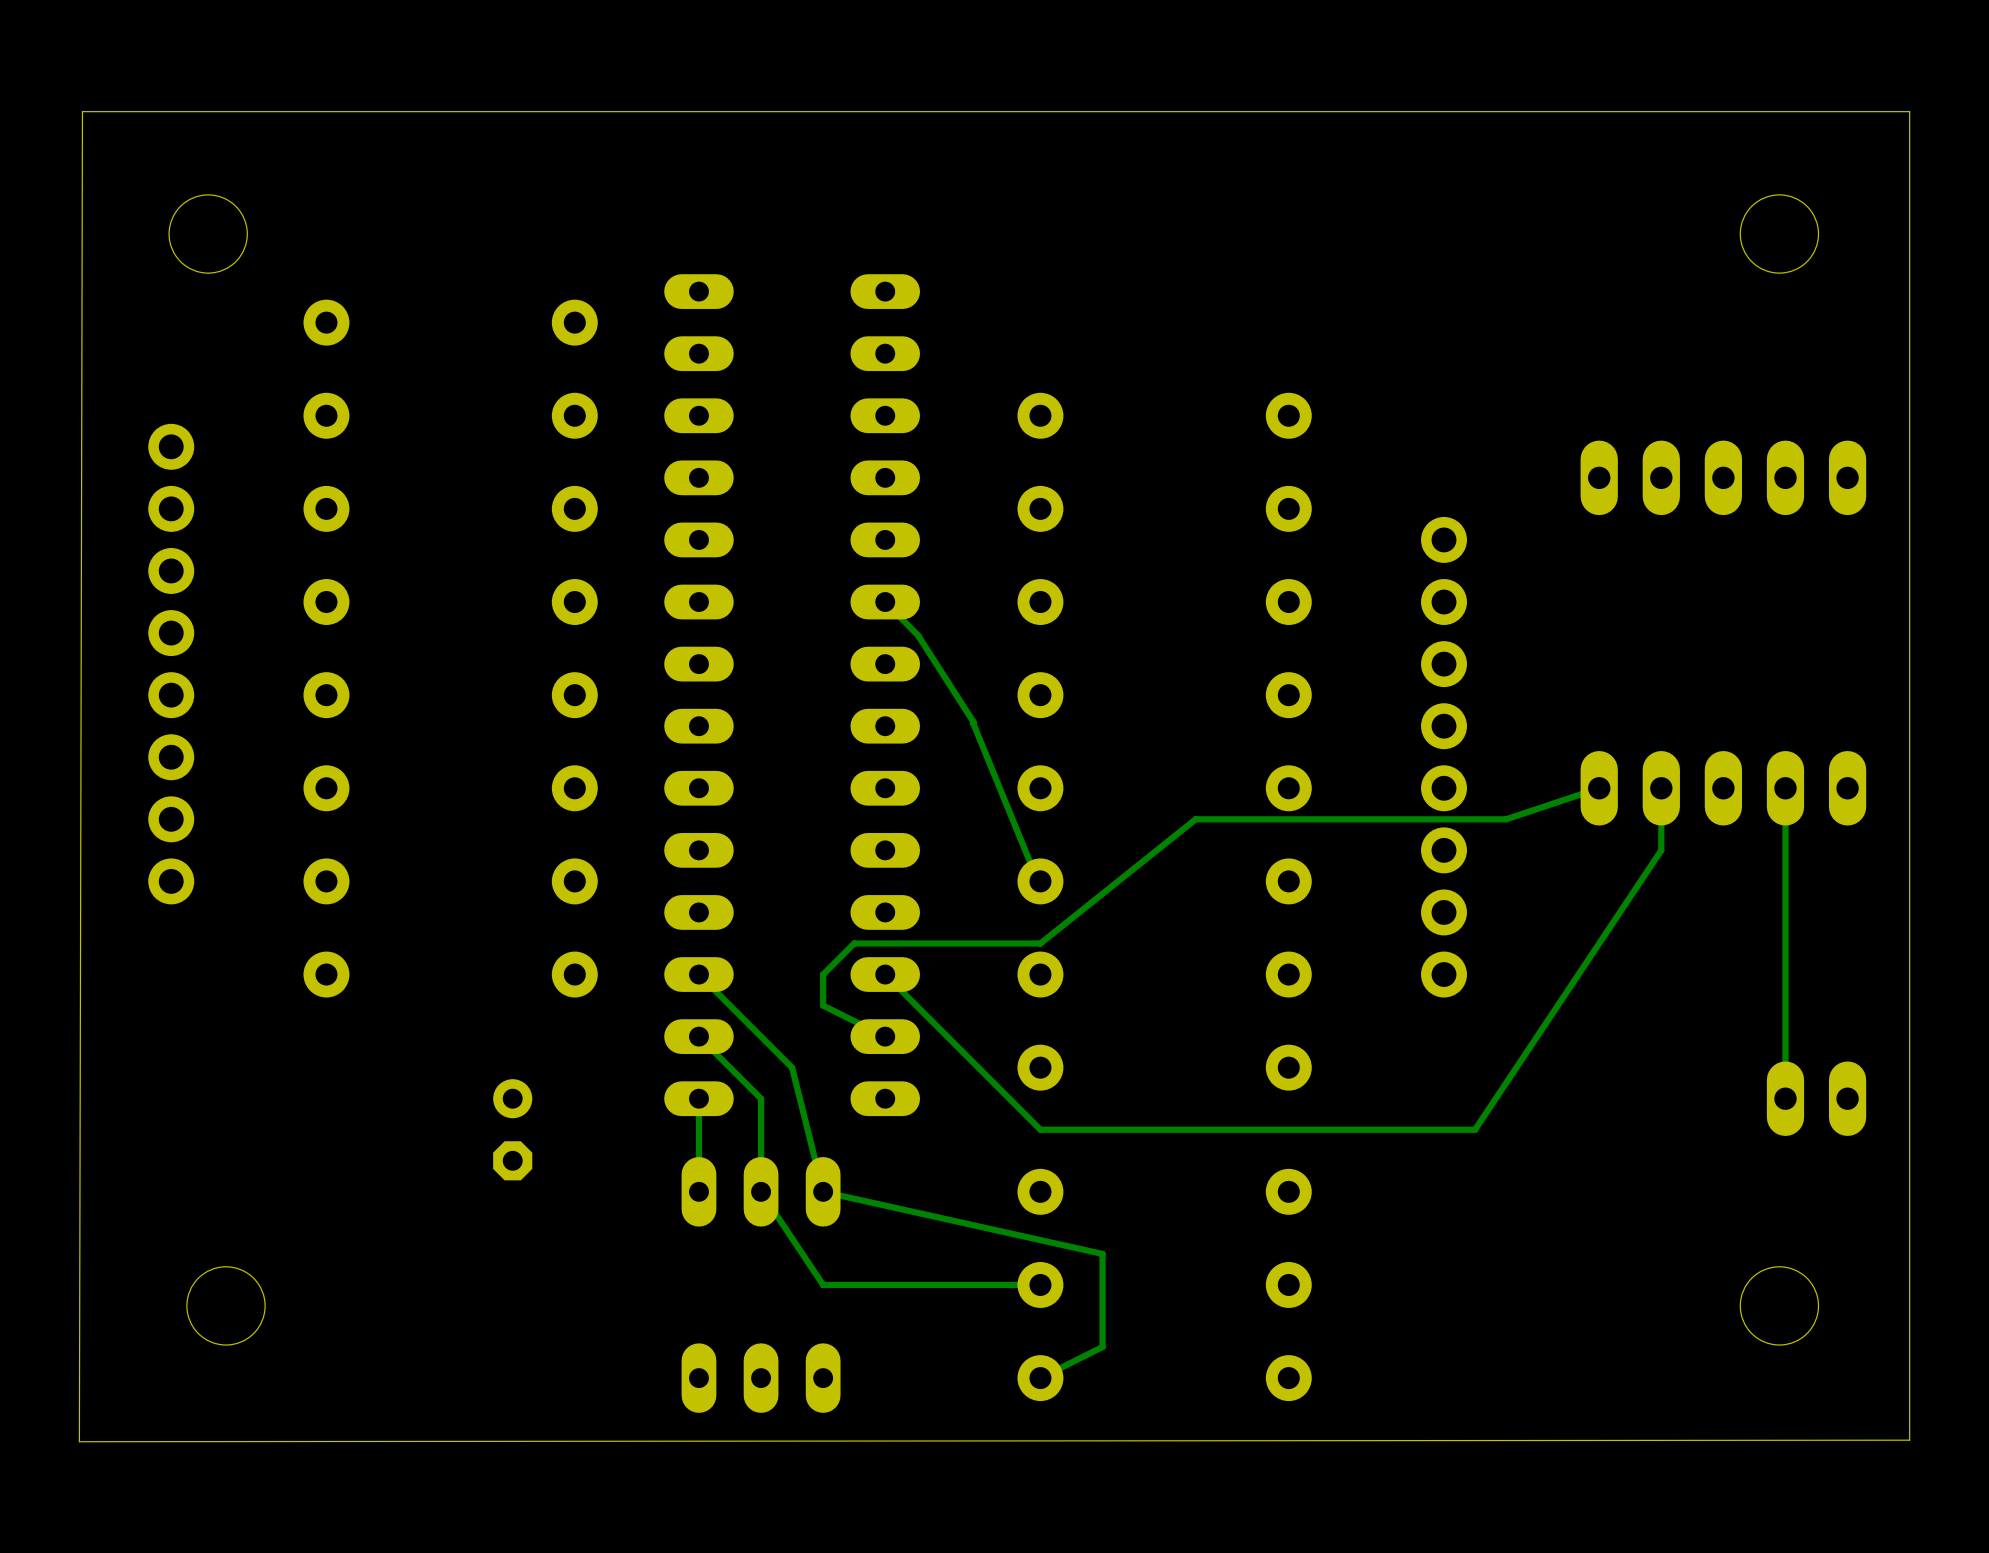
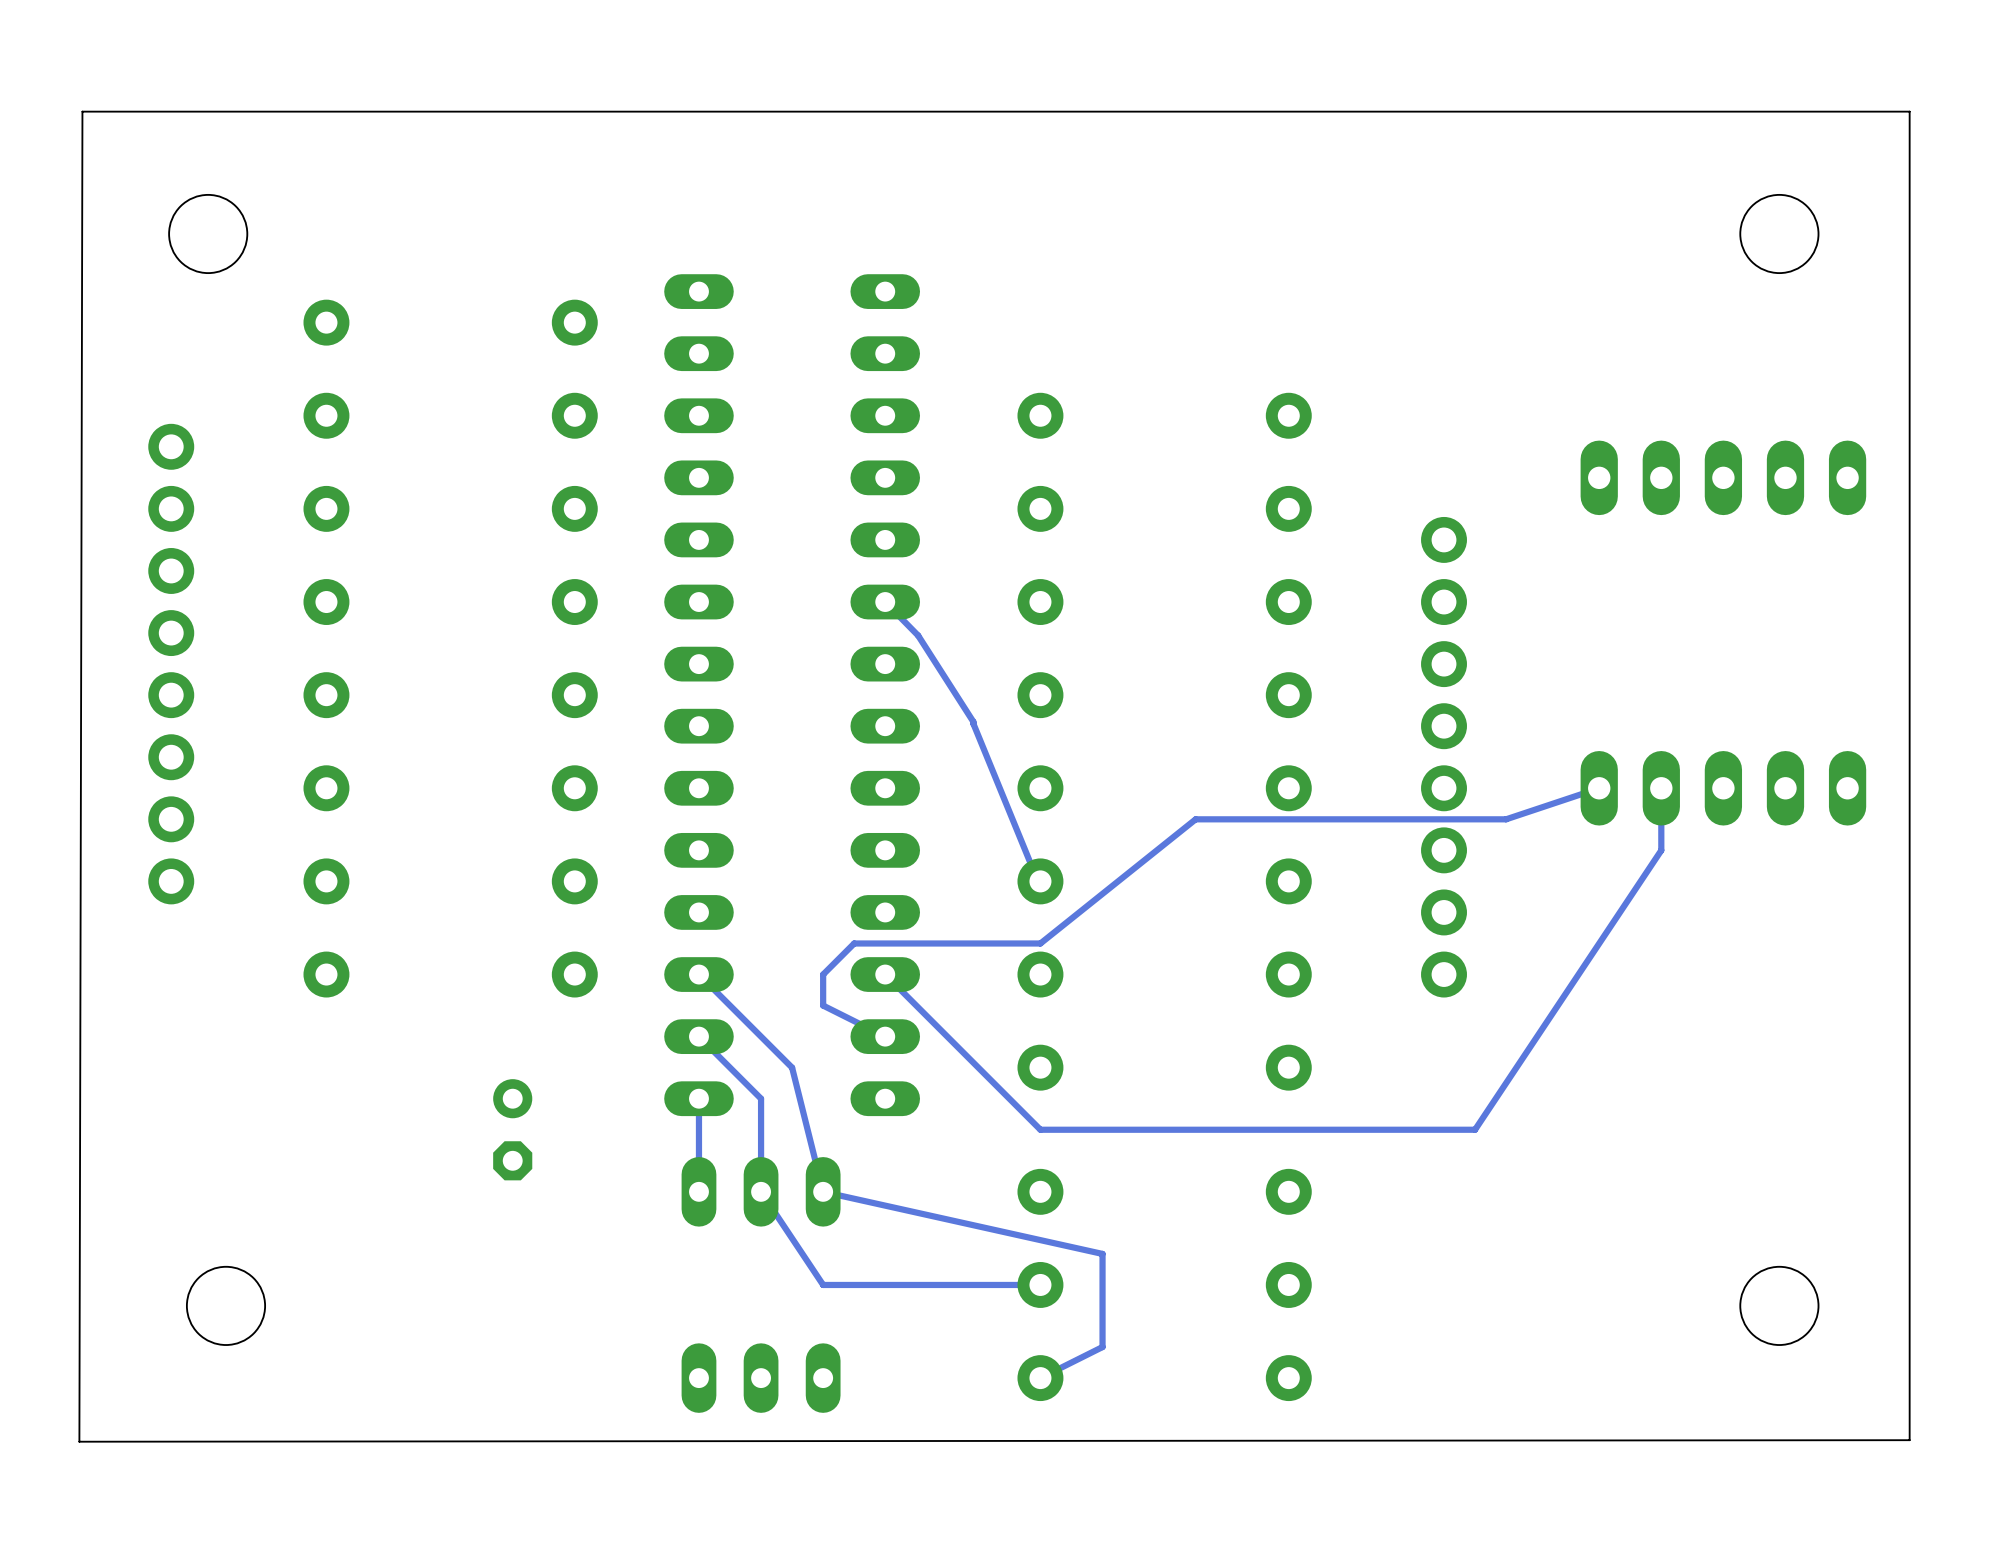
track: (1785, 788) (1785, 1098) -> none
part: (1816, 1098) -> none

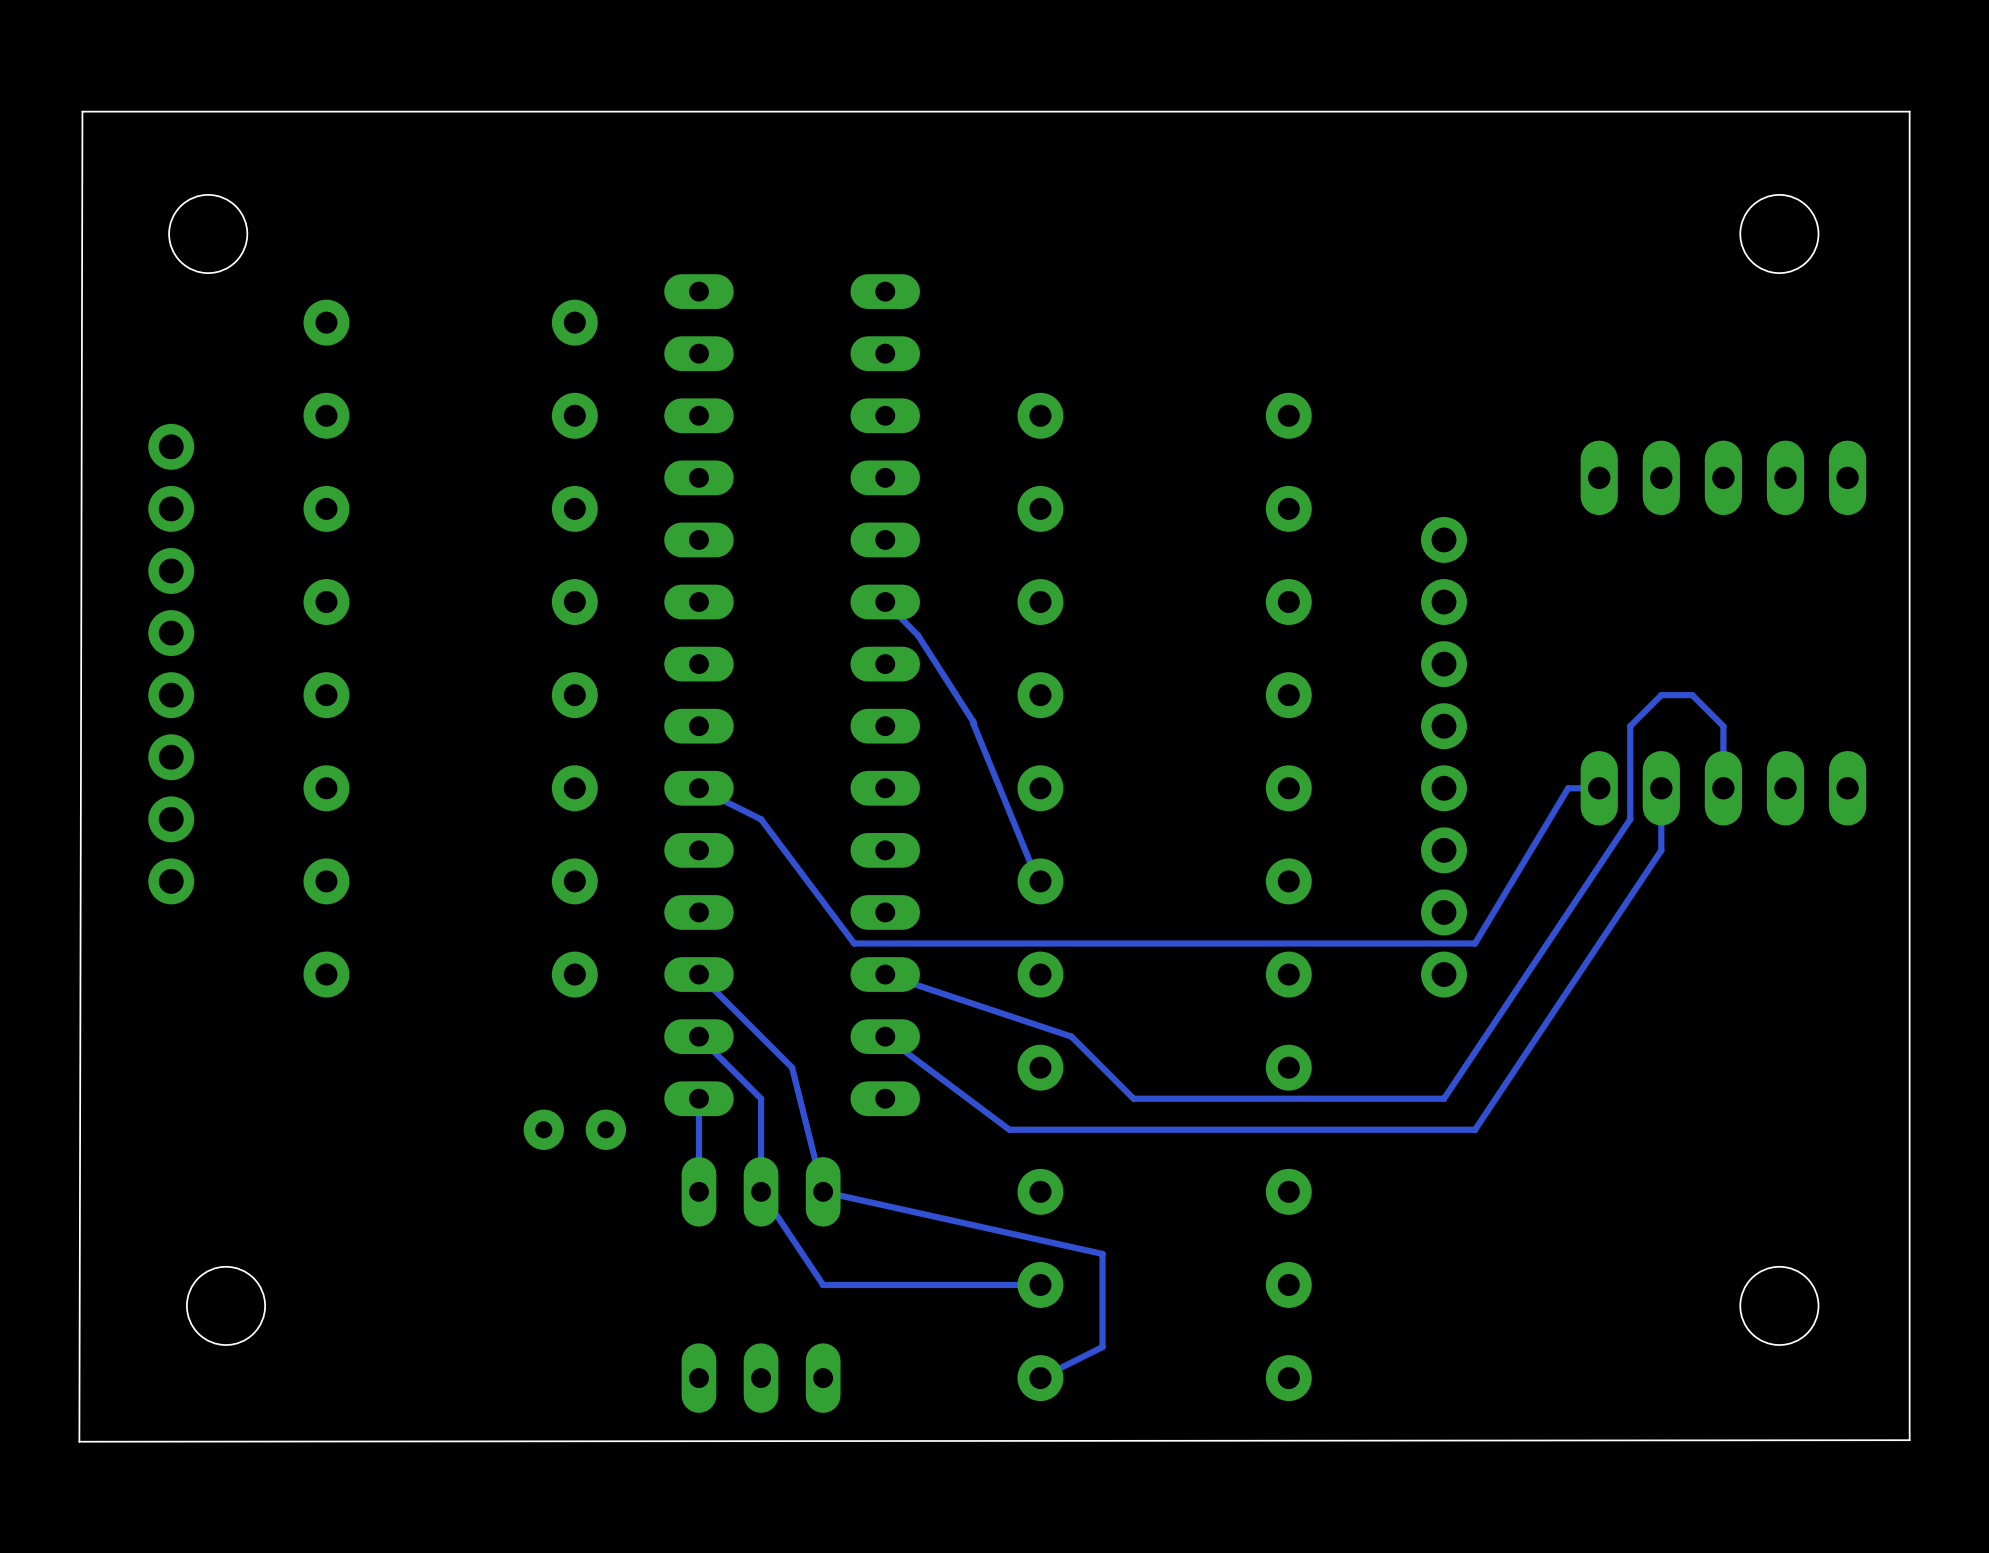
track: (1599, 788) (1506, 819) (1195, 819) (1040, 943) -> (1599, 788) (1568, 788) (1475, 943) (1040, 943)
track: none -> (1723, 788) (1723, 726) (1692, 695) (1661, 695) (1630, 726) (1630, 819) (1444, 1098) (1133, 1098) (1071, 1036) (885, 974)
track: (854, 943) (823, 974) (823, 1005) (885, 1036) -> (854, 943) (761, 819) (698, 788)
track: (885, 974) (1040, 1129) -> (885, 1036) (1009, 1129) (1040, 1129)
part: (512, 1129) -> none
part: none -> (574, 1129)

